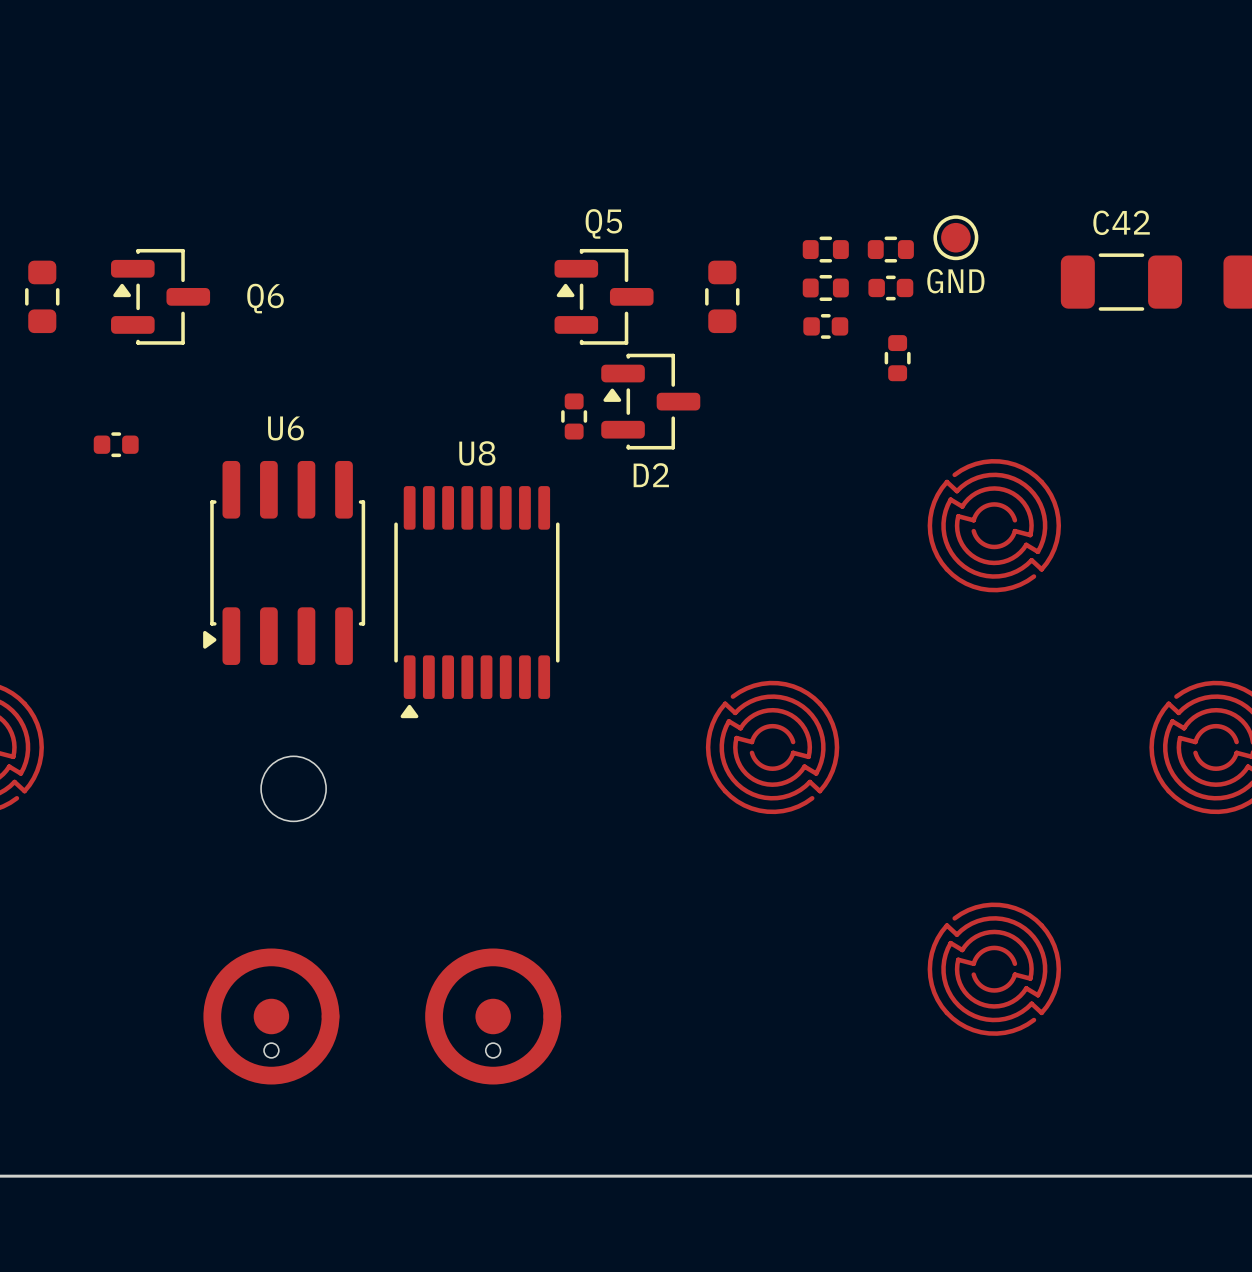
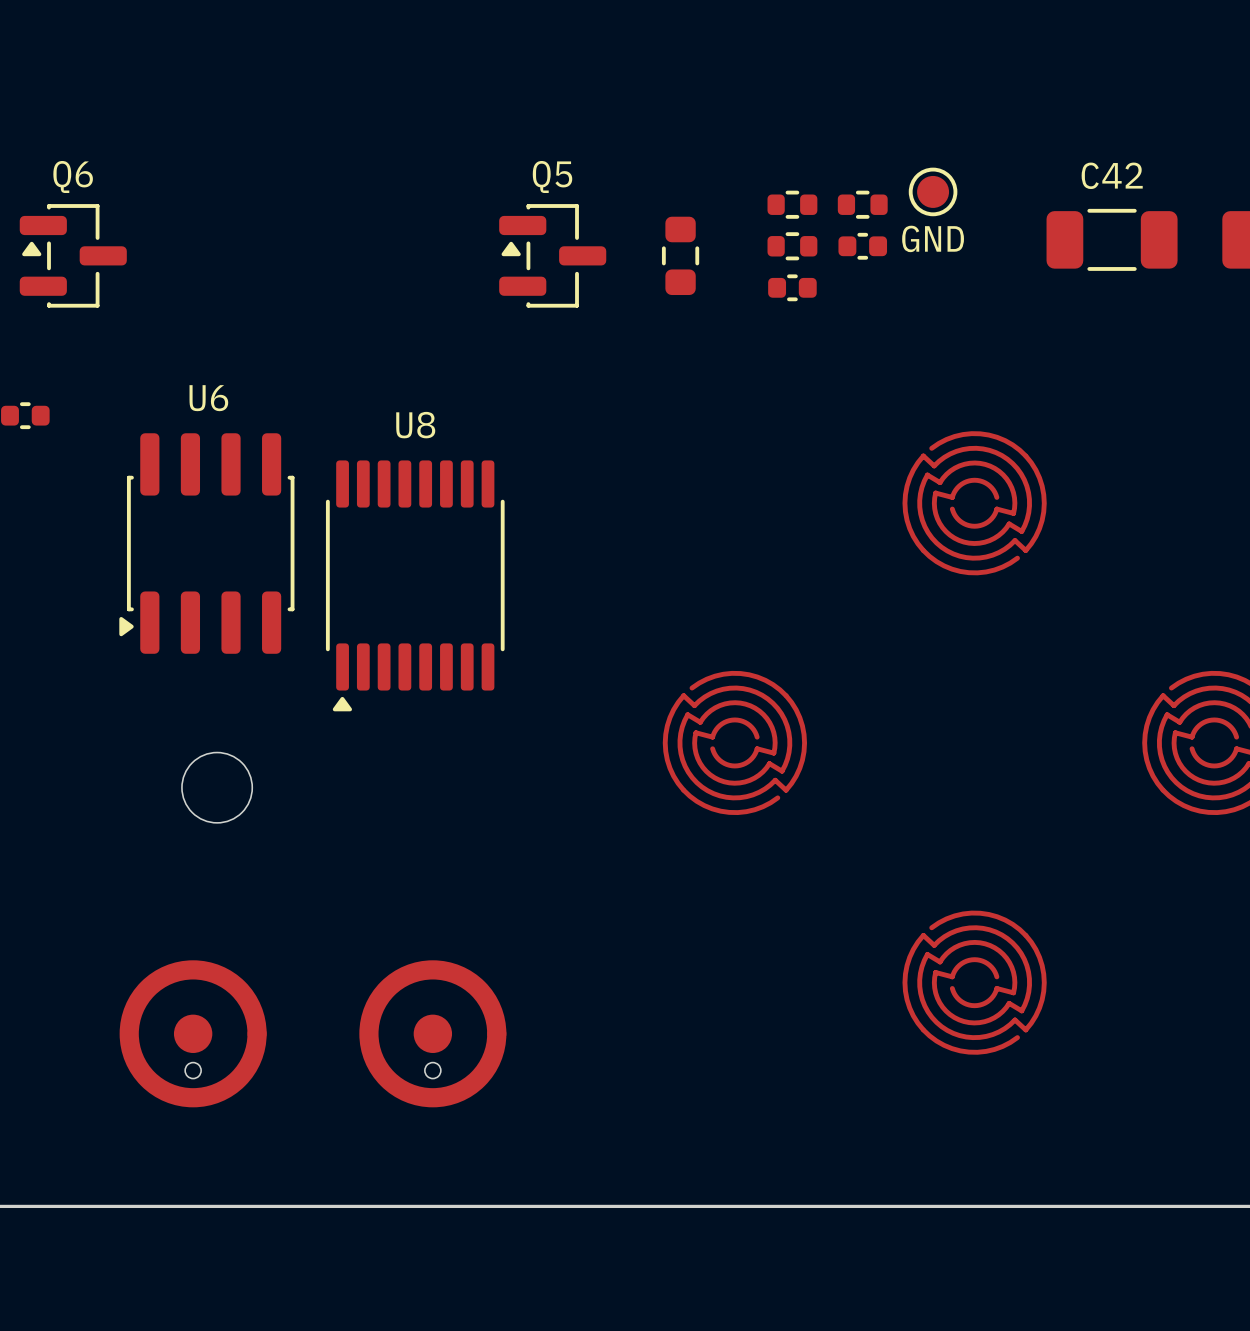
Q6 name position: Q6 (265, 298) -> Q6 (73, 176)
part: (897, 358) -> none
D2: (650, 401) -> none
part: (574, 416) -> none

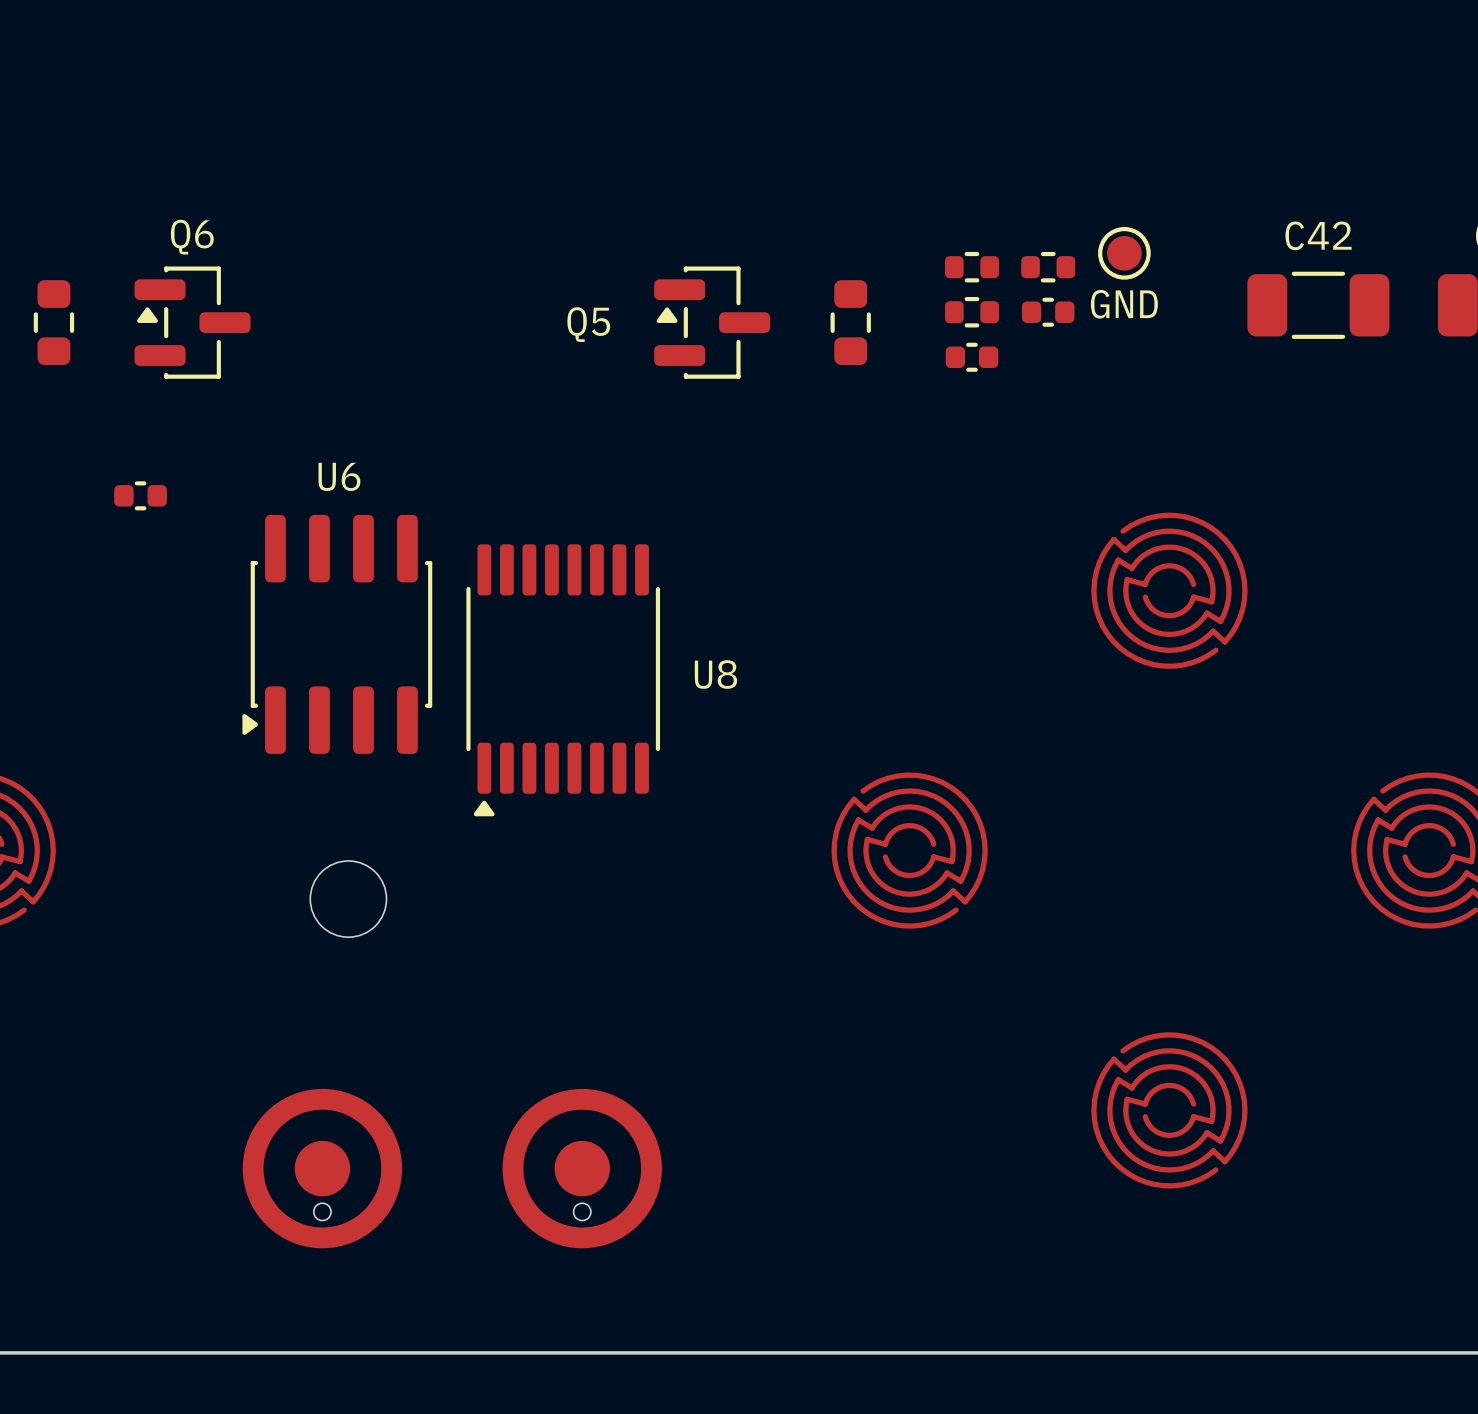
Q5 name position: Q5 (552, 176) -> Q5 (588, 324)
U8 name position: U8 (415, 425) -> U8 (715, 674)
part footprint: [119, 960, 267, 1108] -> [242, 1088, 403, 1249]
part footprint: [359, 960, 507, 1108] -> [502, 1088, 662, 1249]

